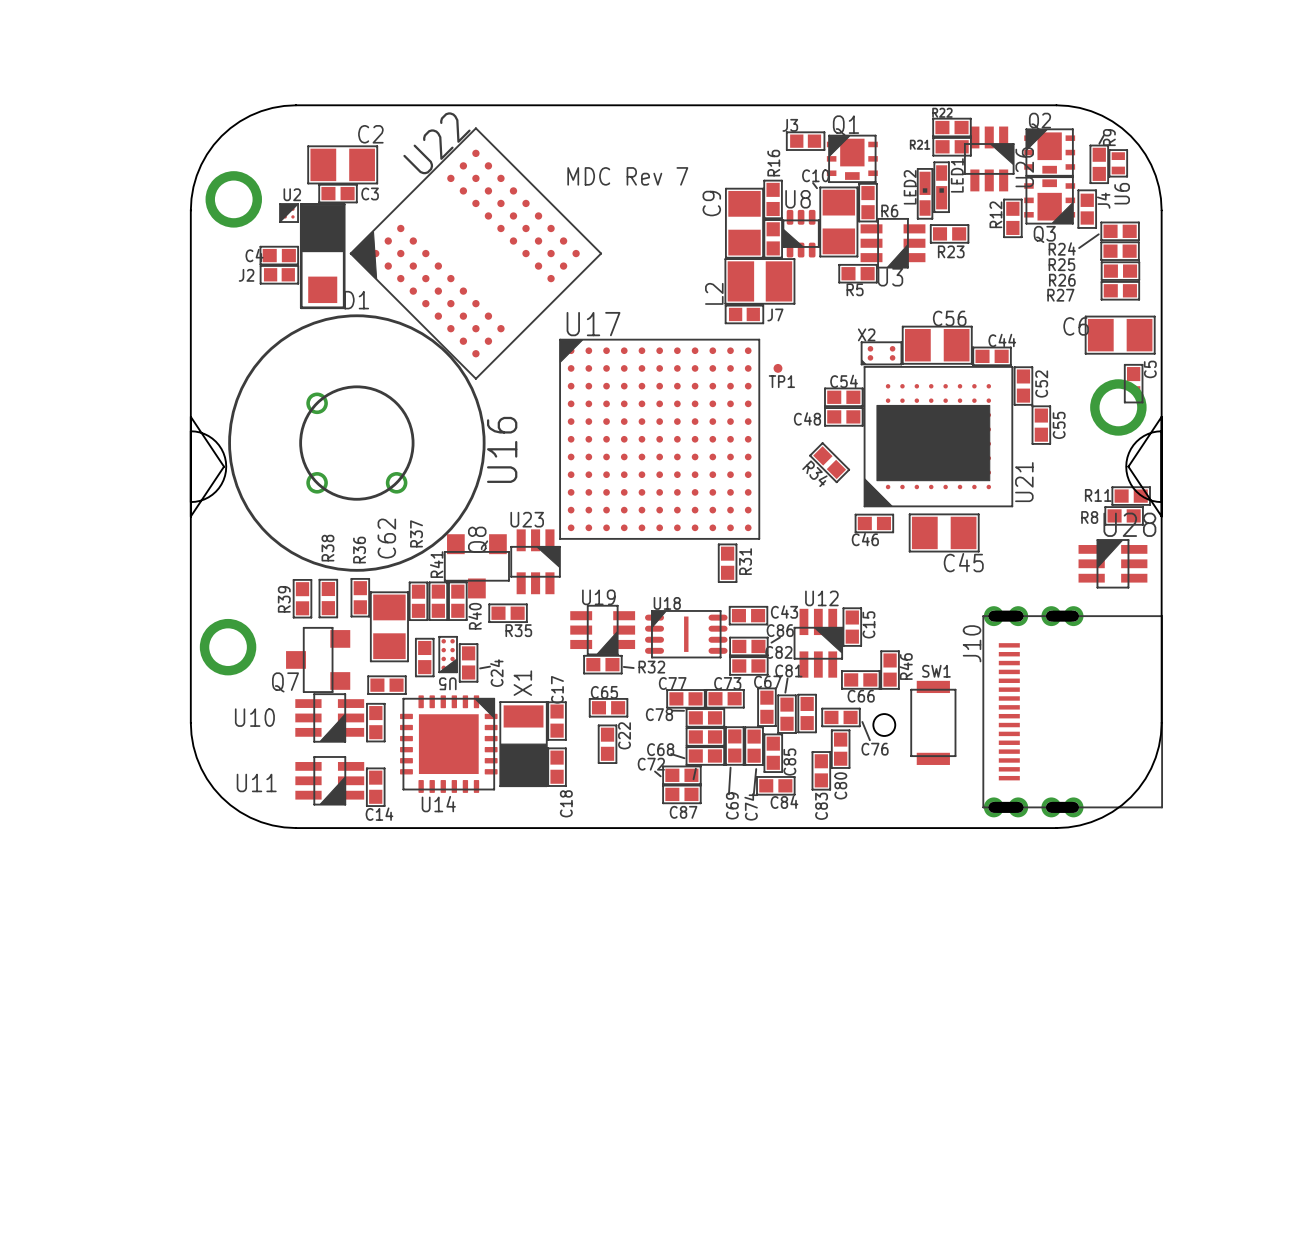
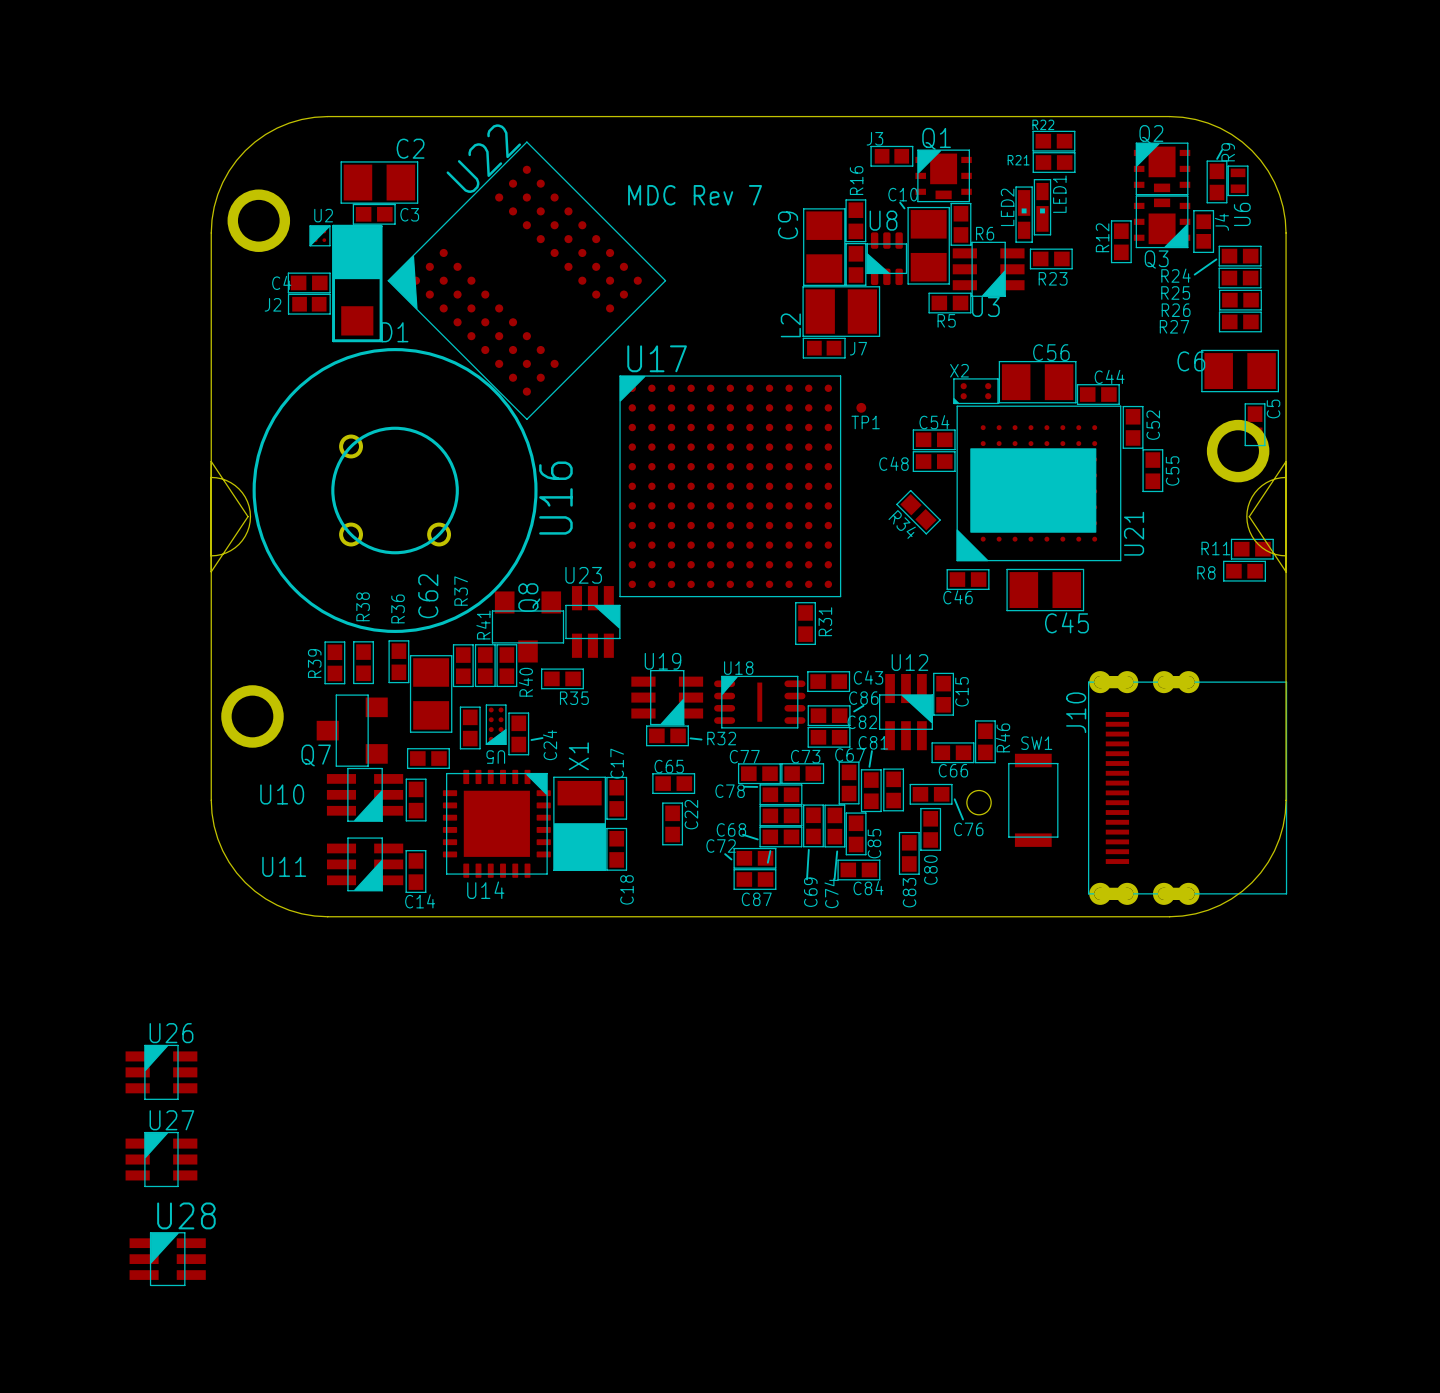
U26 rotation: 0° (989, 158) -> 90° counterclockwise (161, 1072)
U26 position: (989, 158) -> (161, 1072)
U28 position: (1112, 563) -> (167, 1259)
U27: none -> (161, 1159)

